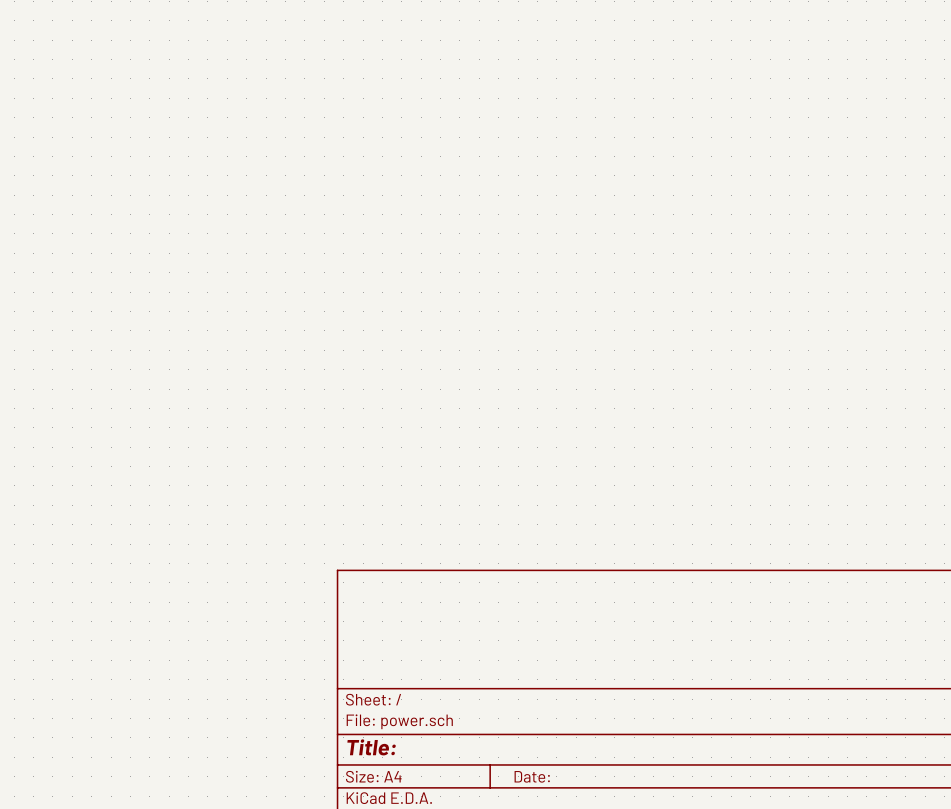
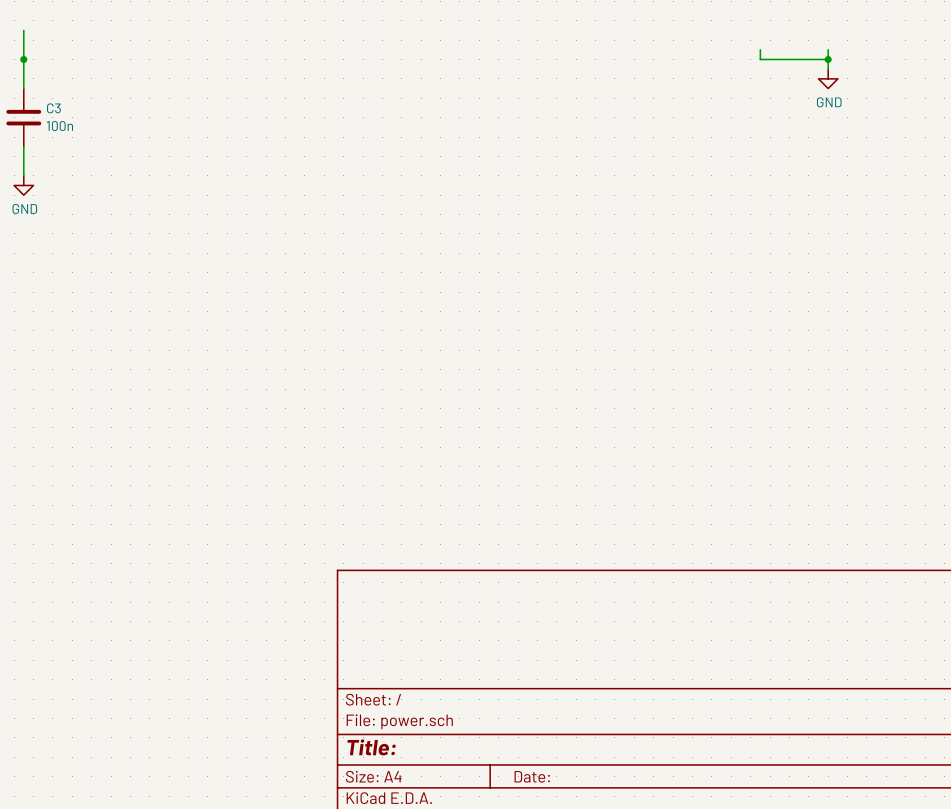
wire: none -> (23, 30) (23, 88)
wire: none -> (760, 49) (760, 59) (828, 59)
wire: none -> (828, 49) (828, 69)
junction: none -> (23, 59)
junction: none -> (828, 59)
power symbol: none -> GND (828, 78)
C3: none -> 100n (23, 117)
wire: none -> (23, 146) (23, 175)
power symbol: none -> GND (23, 185)

